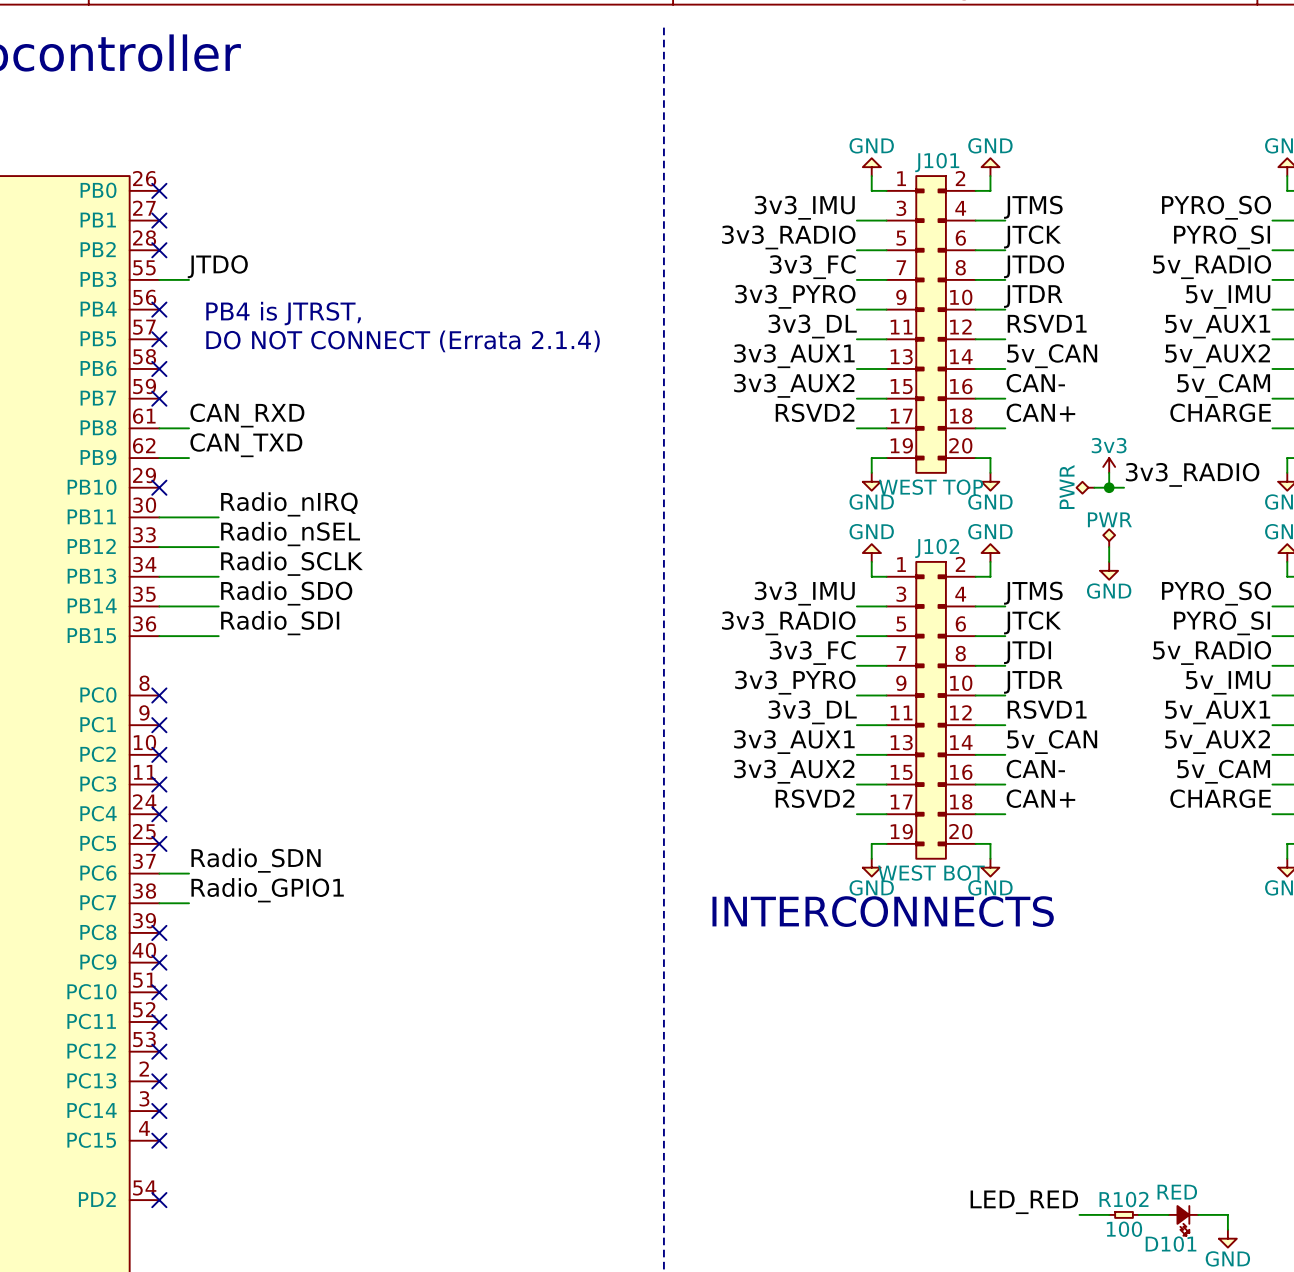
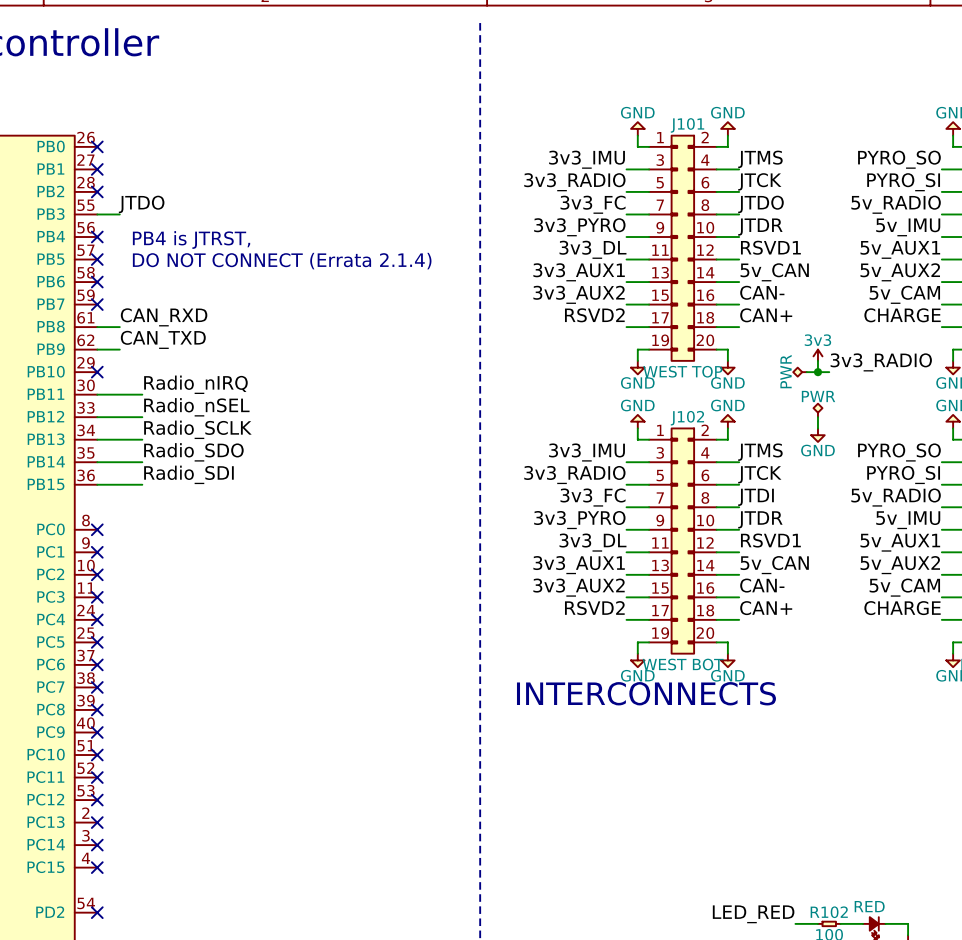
label: Radio_SDN (256, 860) -> none
wire: (159, 873) (189, 873) -> none
no-connect mark: none -> (97, 664)
label: Radio_GPIO1 (267, 890) -> none
wire: (159, 903) (189, 903) -> none
no-connect mark: none -> (97, 687)

